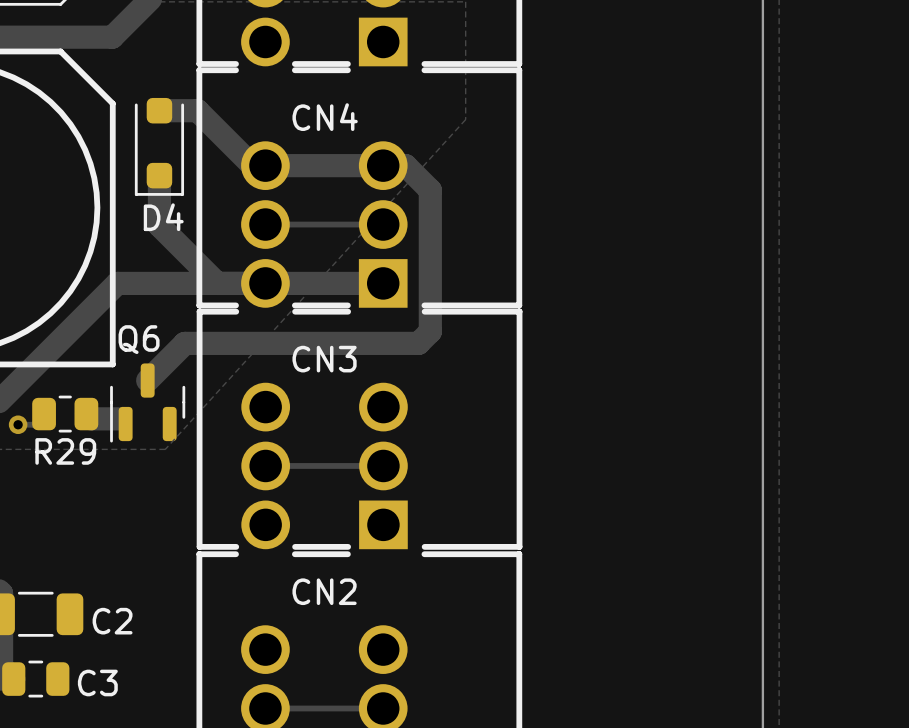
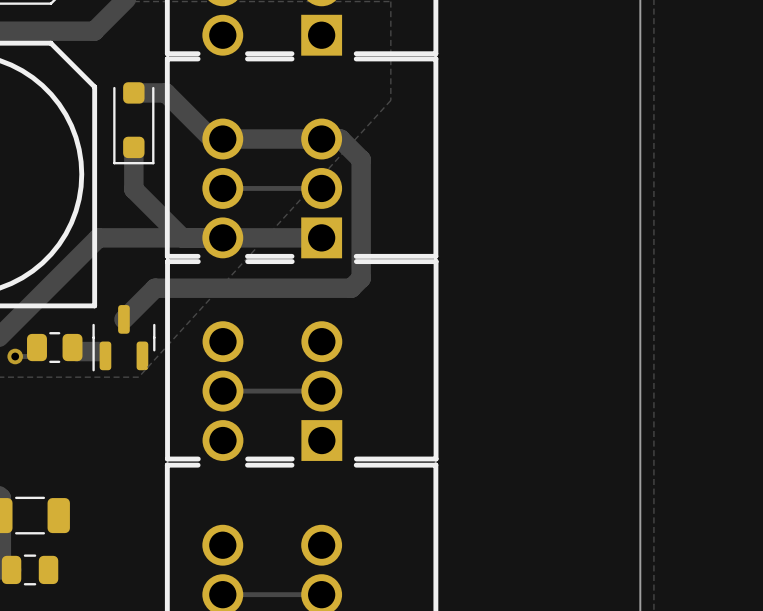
CN4 name: CN4 (325, 117) -> none
D4 name: D4 (163, 217) -> none
Q6 name: Q6 (139, 339) -> none
CN3 name: CN3 (324, 359) -> none
R29 name: R29 (65, 451) -> none
CN2 name: CN2 (324, 591) -> none
C2 name: C2 (112, 621) -> none
C3 name: C3 (97, 682) -> none

